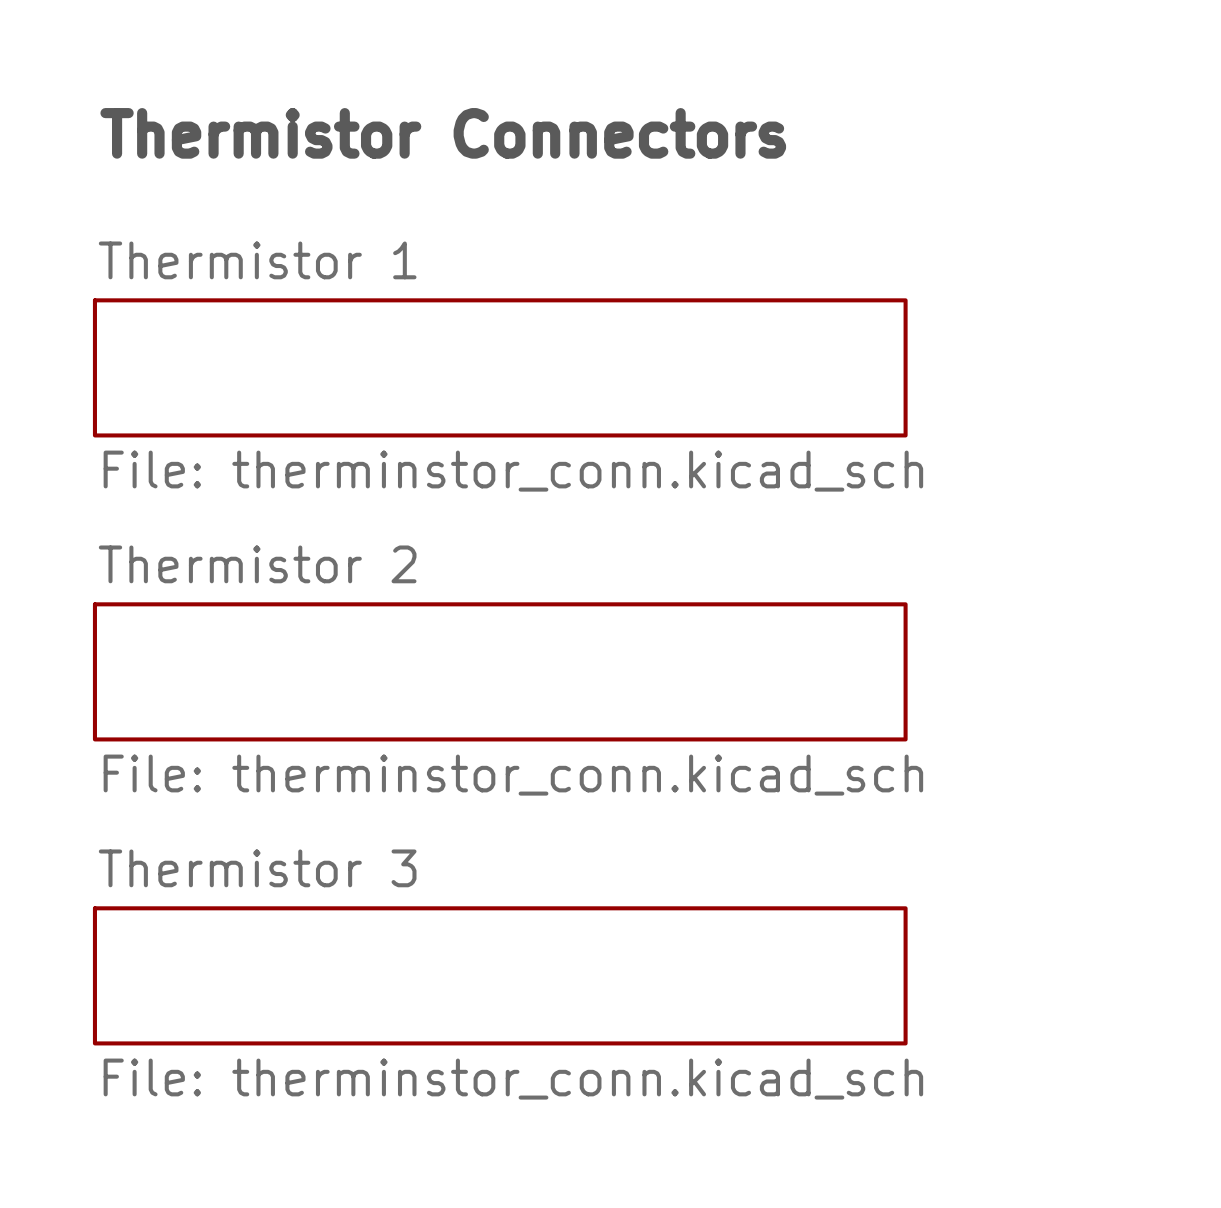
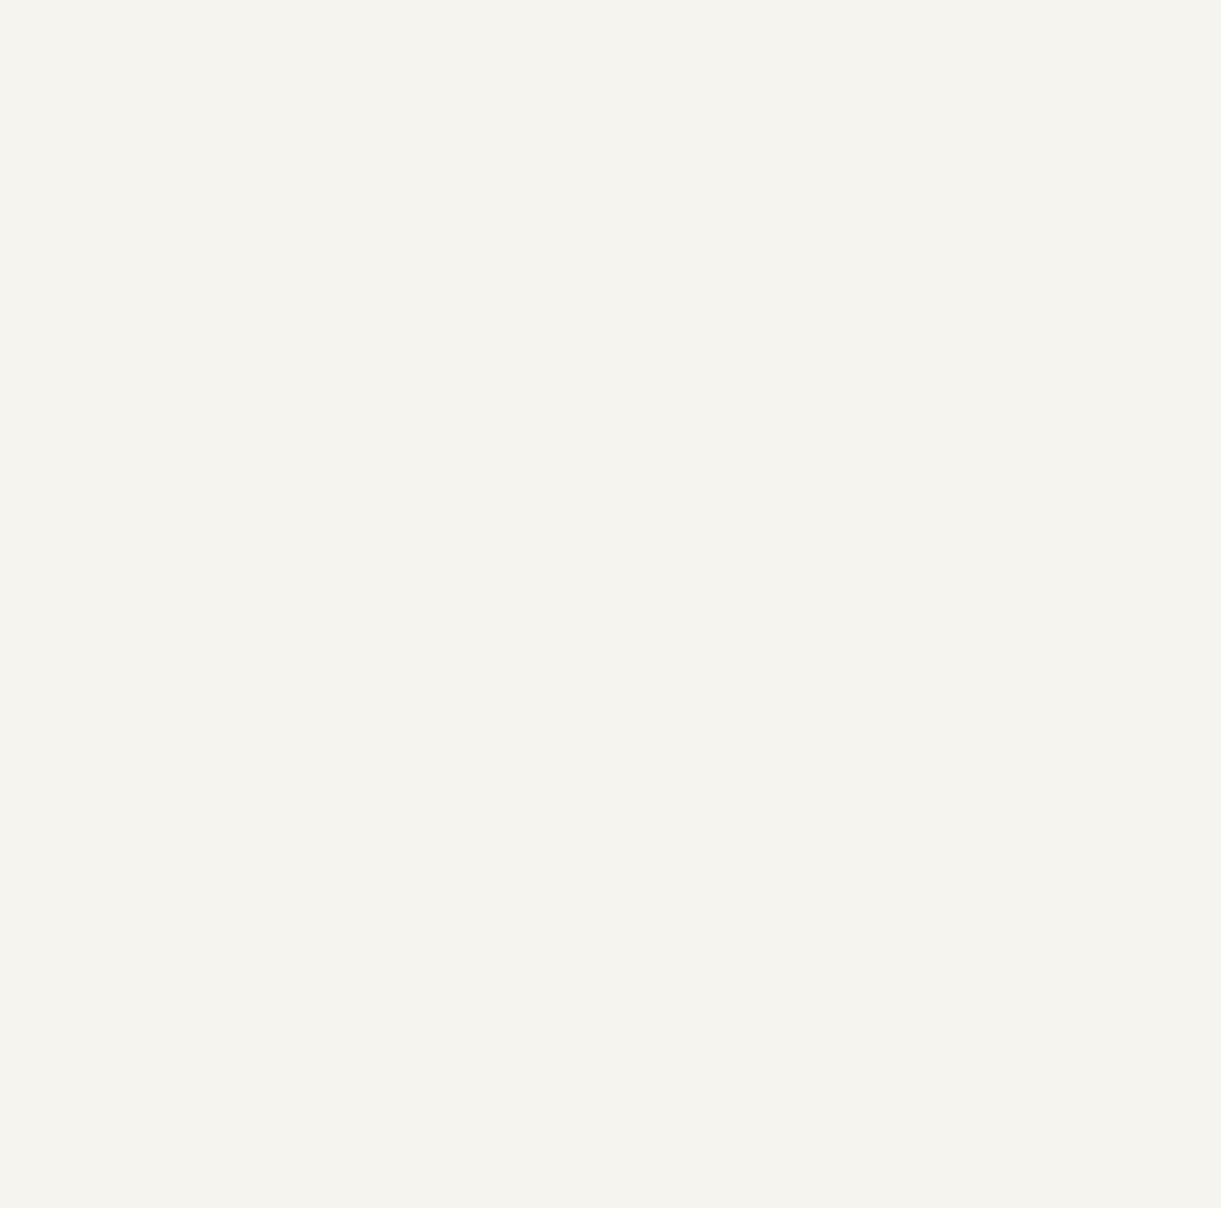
text: Thermistor Connectors (443, 133) -> none
sheet Thermistor 1: File: therminstor_conn.kicad_sch (500, 367) -> none
sheet Thermistor 2: File: therminstor_conn.kicad_sch (500, 671) -> none
sheet Thermistor 3: File: therminstor_conn.kicad_sch (500, 975) -> none

